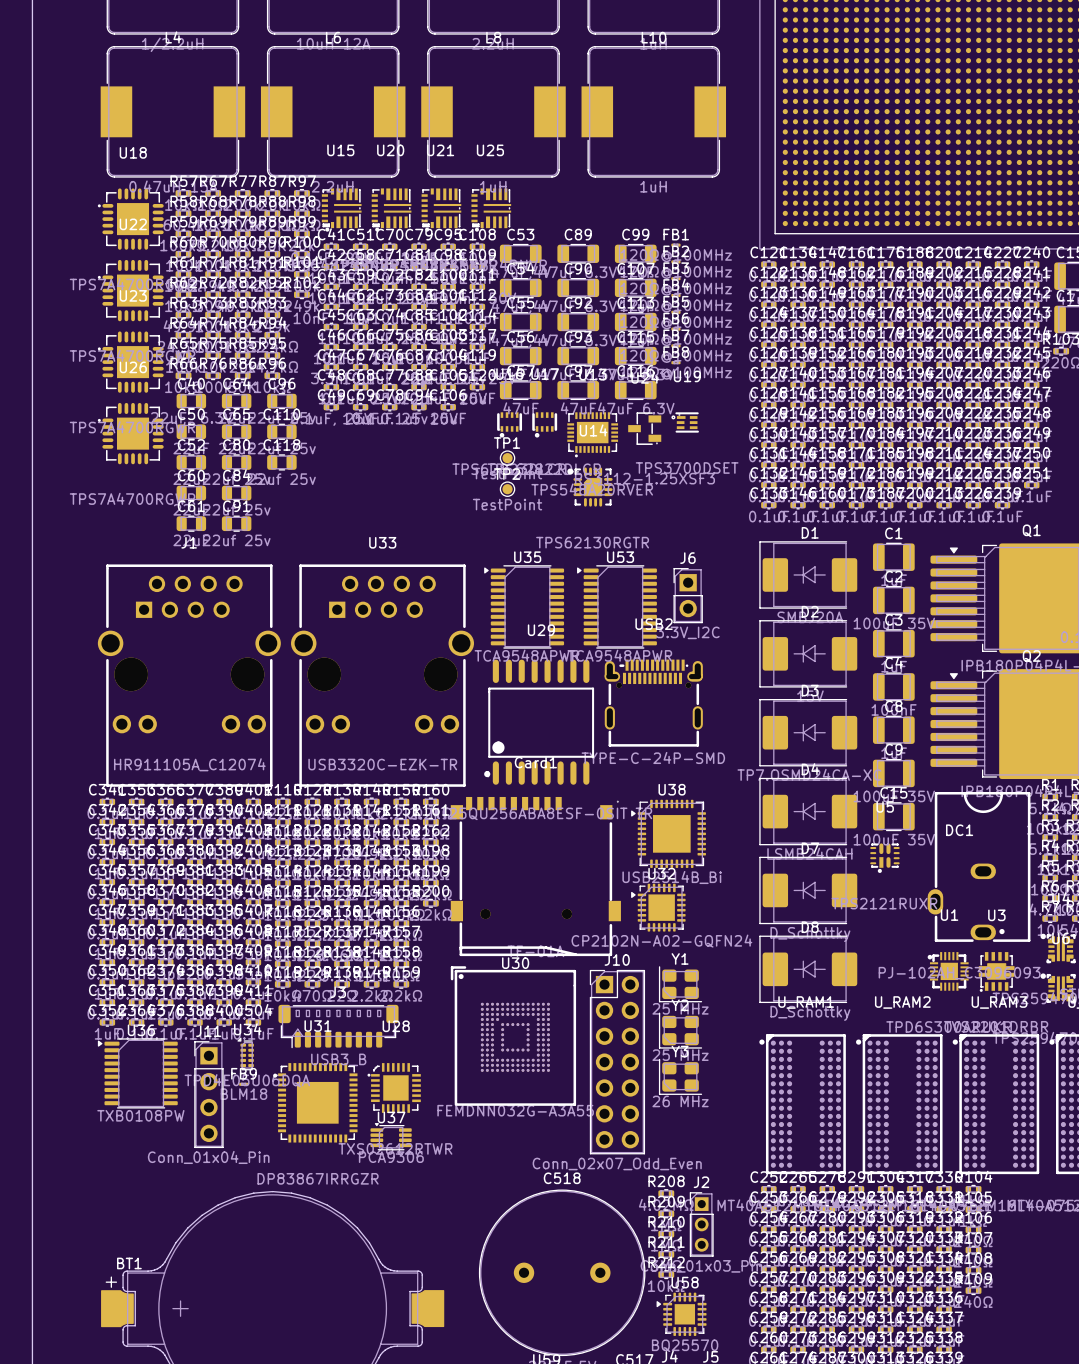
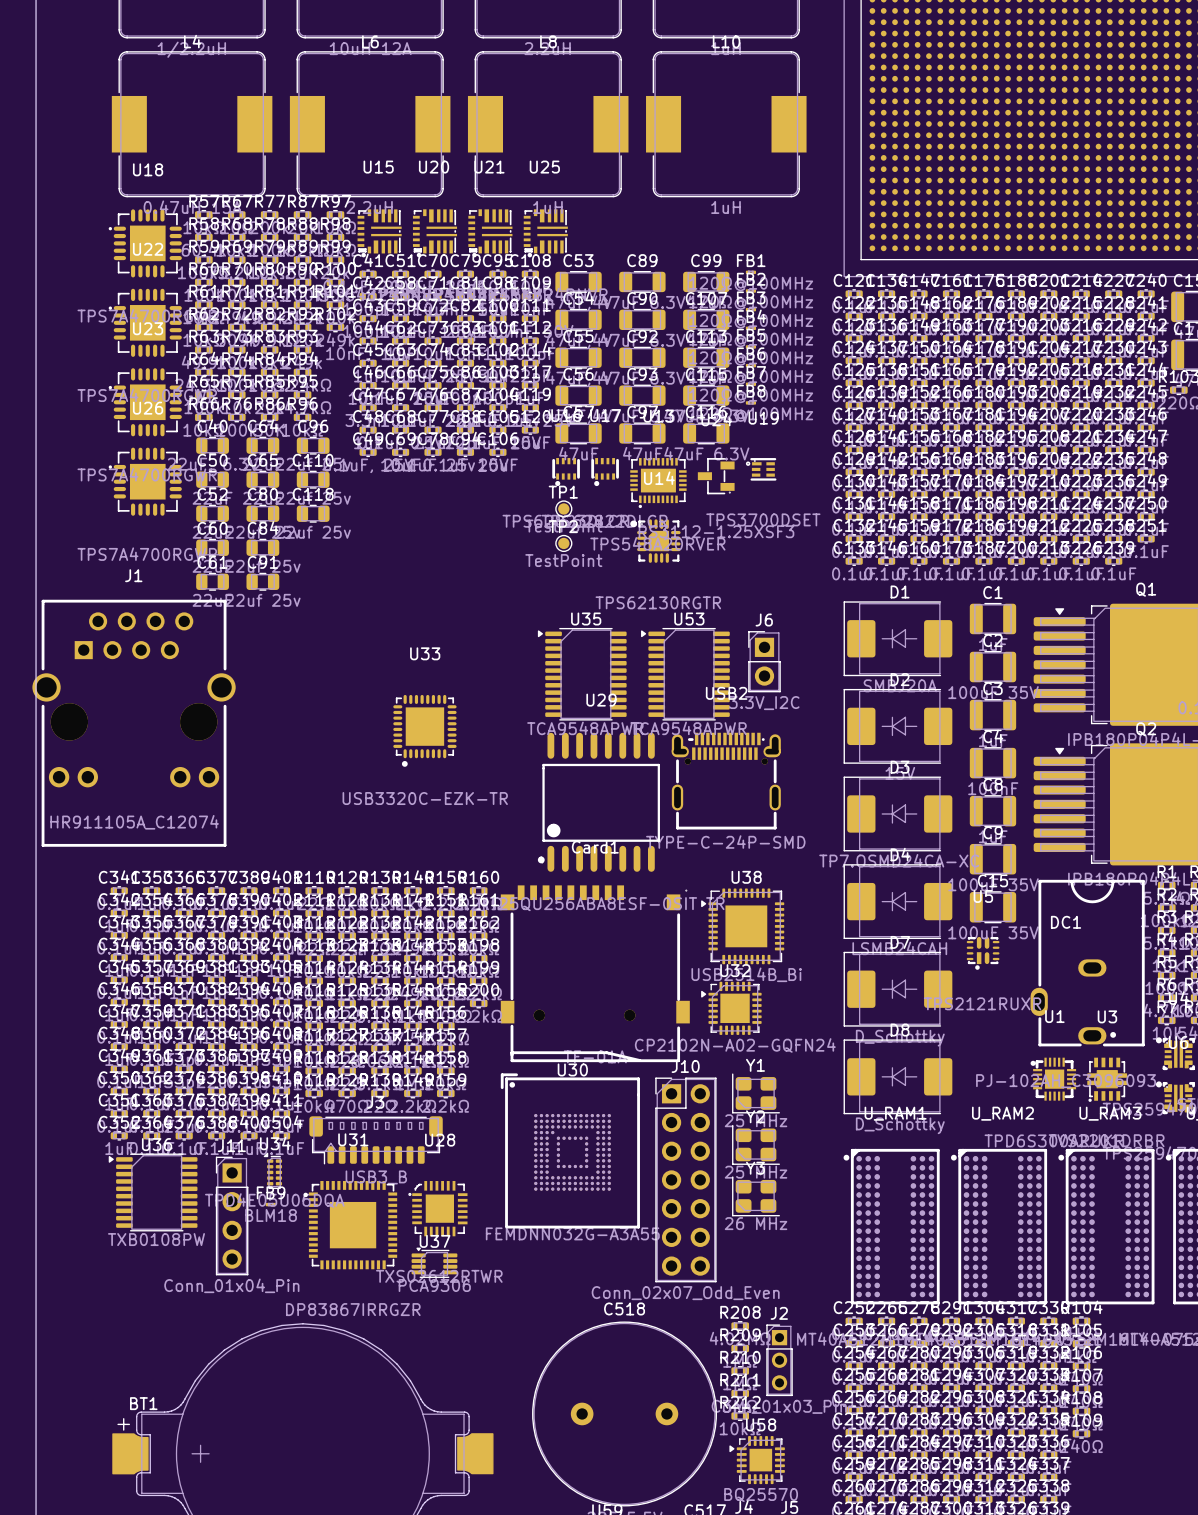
U33 name position: U33 (382, 542) -> U33 (425, 653)
U33 footprint: [291, 564, 475, 787] -> [393, 694, 457, 767]
J1 position: (189, 675) -> (134, 723)
U33 value position: USB3320C-EZK-TR (382, 764) -> USB3320C-EZK-TR (425, 798)

